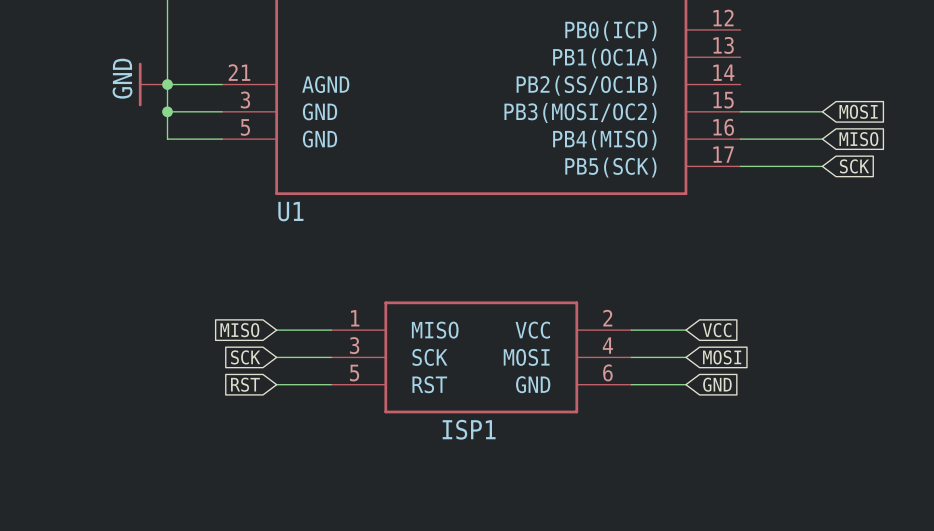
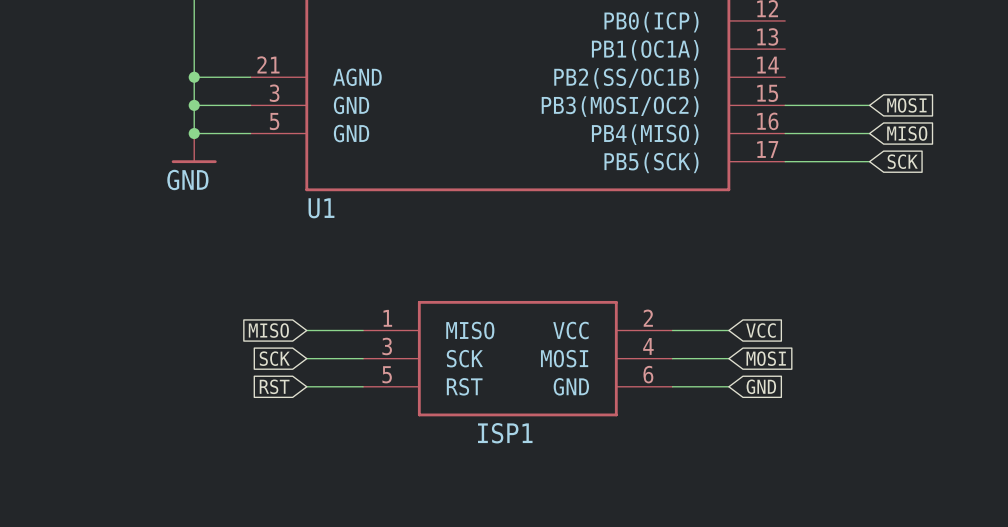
power symbol rotation: 0° (140, 84) -> 90° counterclockwise (194, 161)
power symbol position: GND (153, 84) -> GND (194, 148)
junction: none -> (194, 133)

